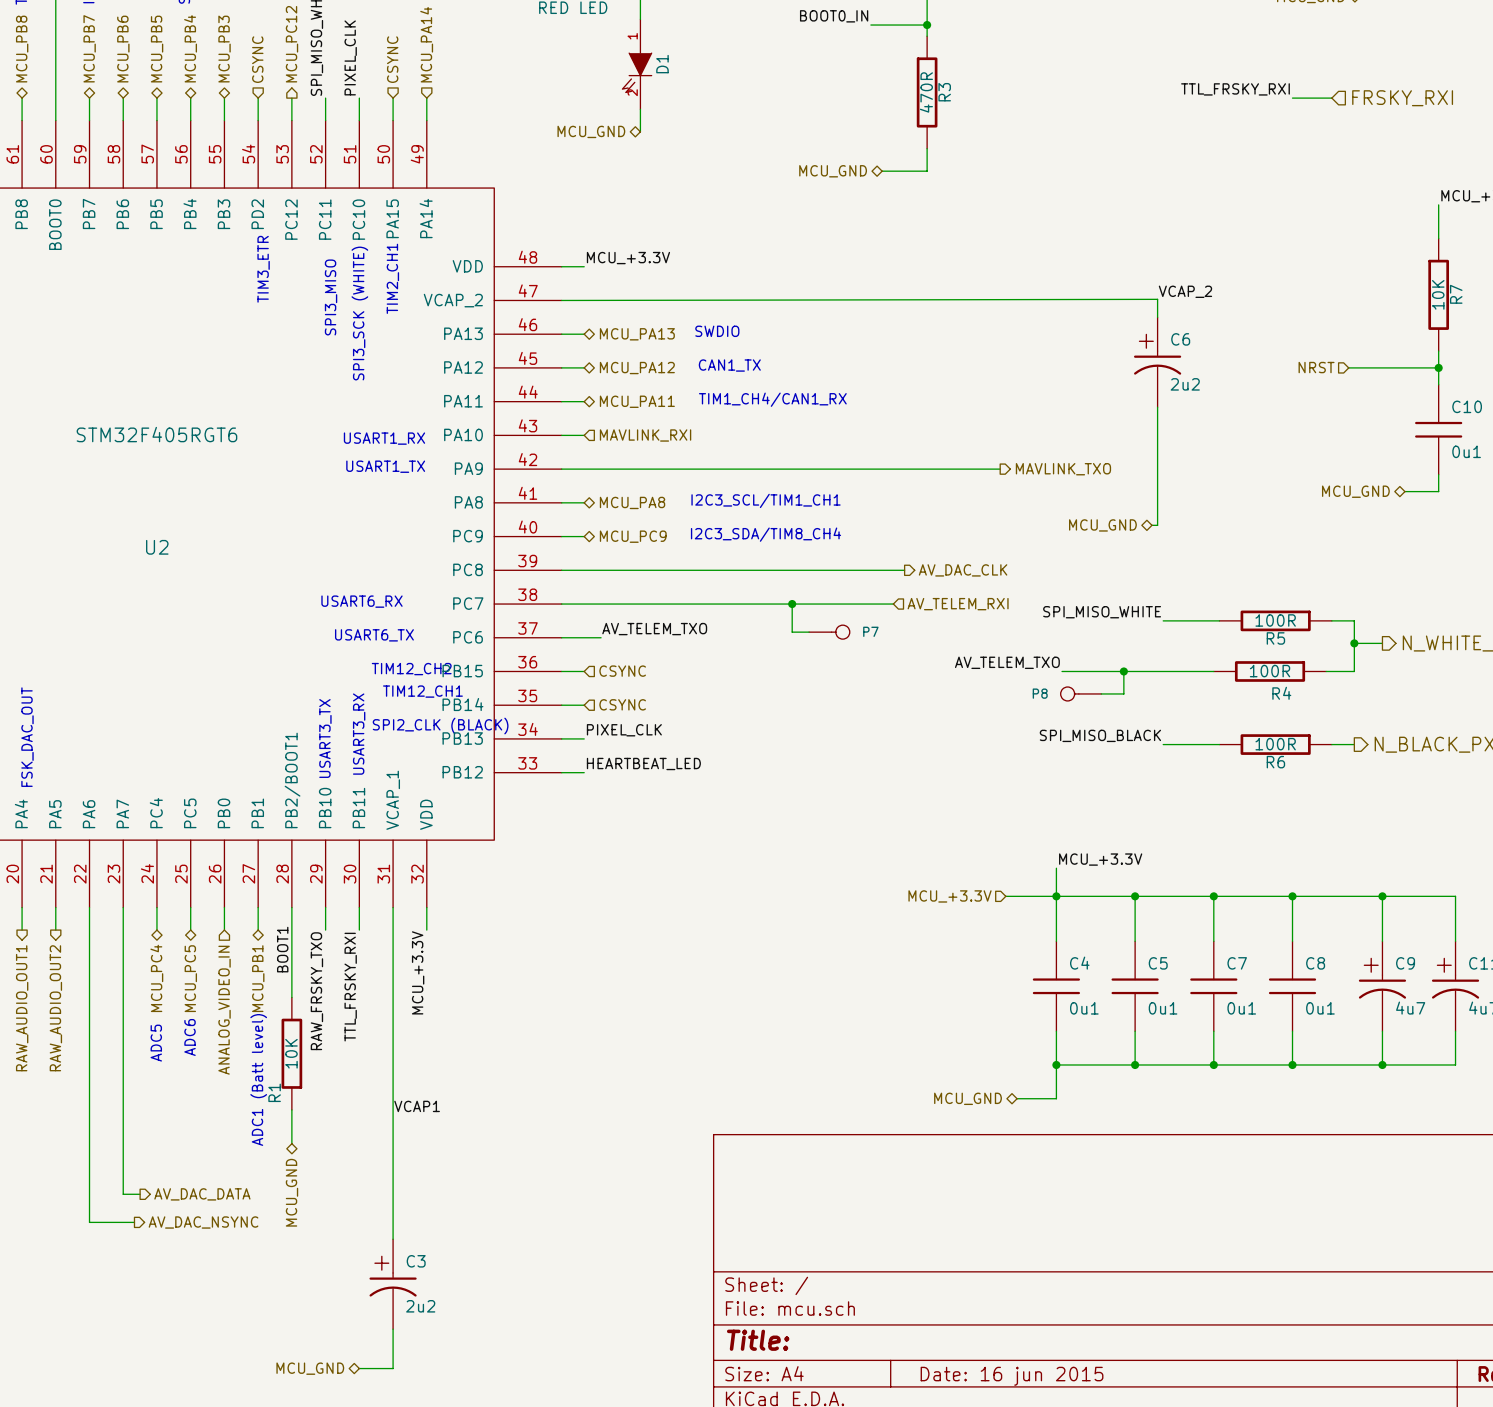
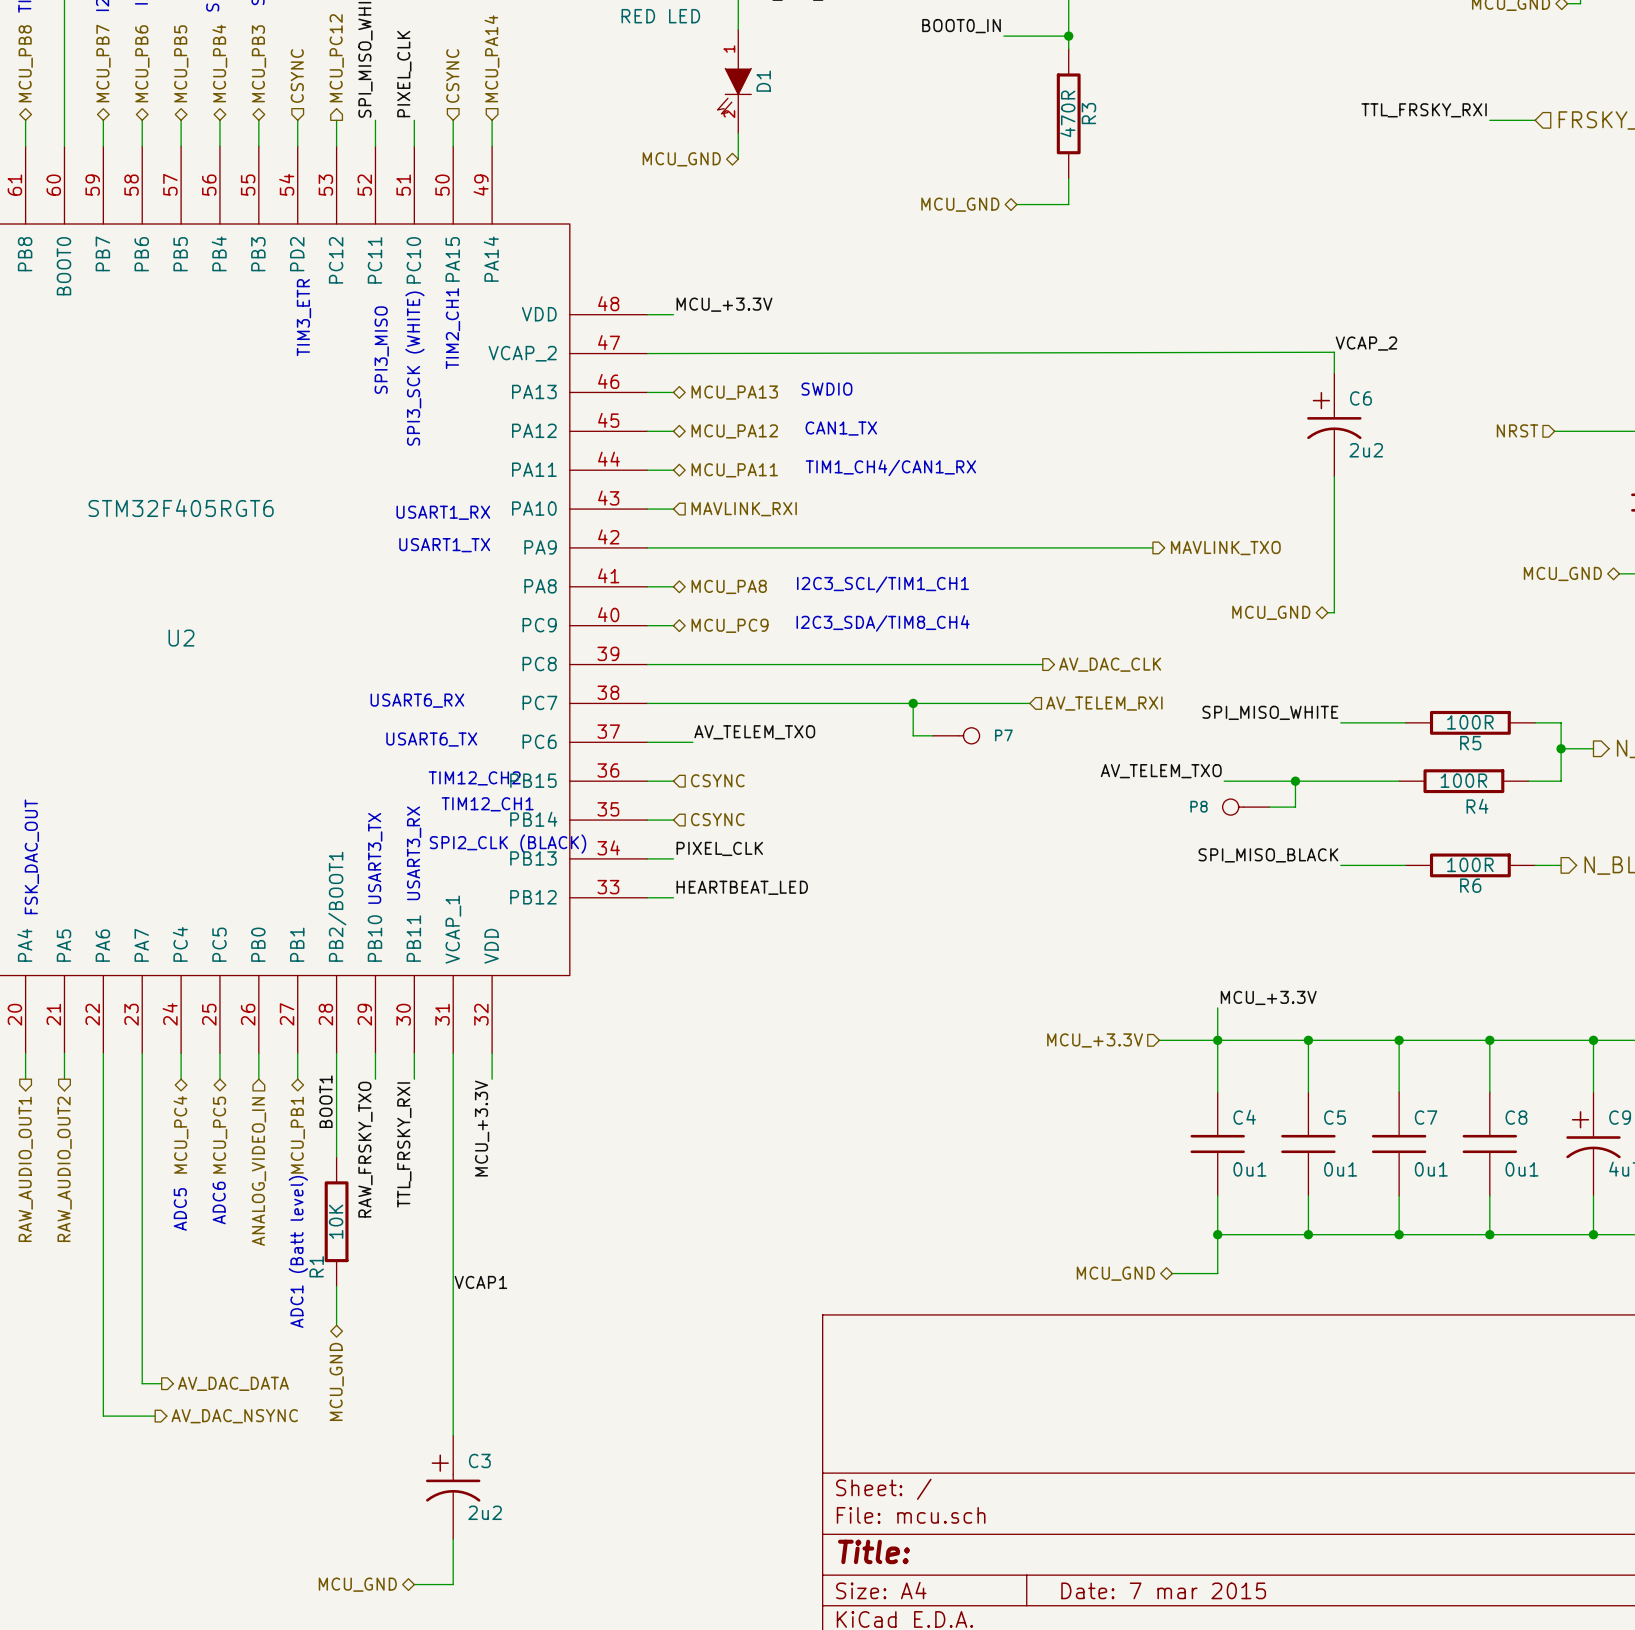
title block: Date: 16 jun 2015 (1012, 1376) -> Date: 7 mar 2015 (1163, 1590)

